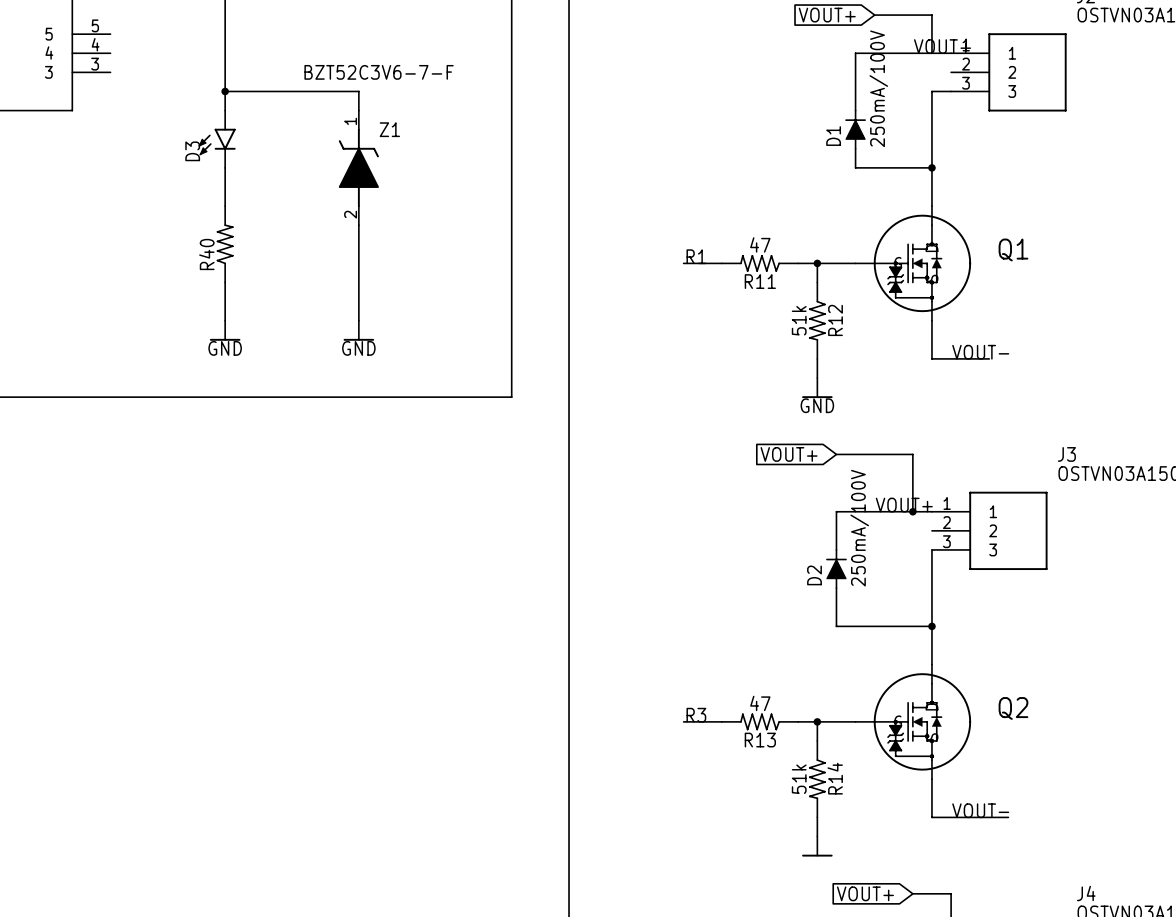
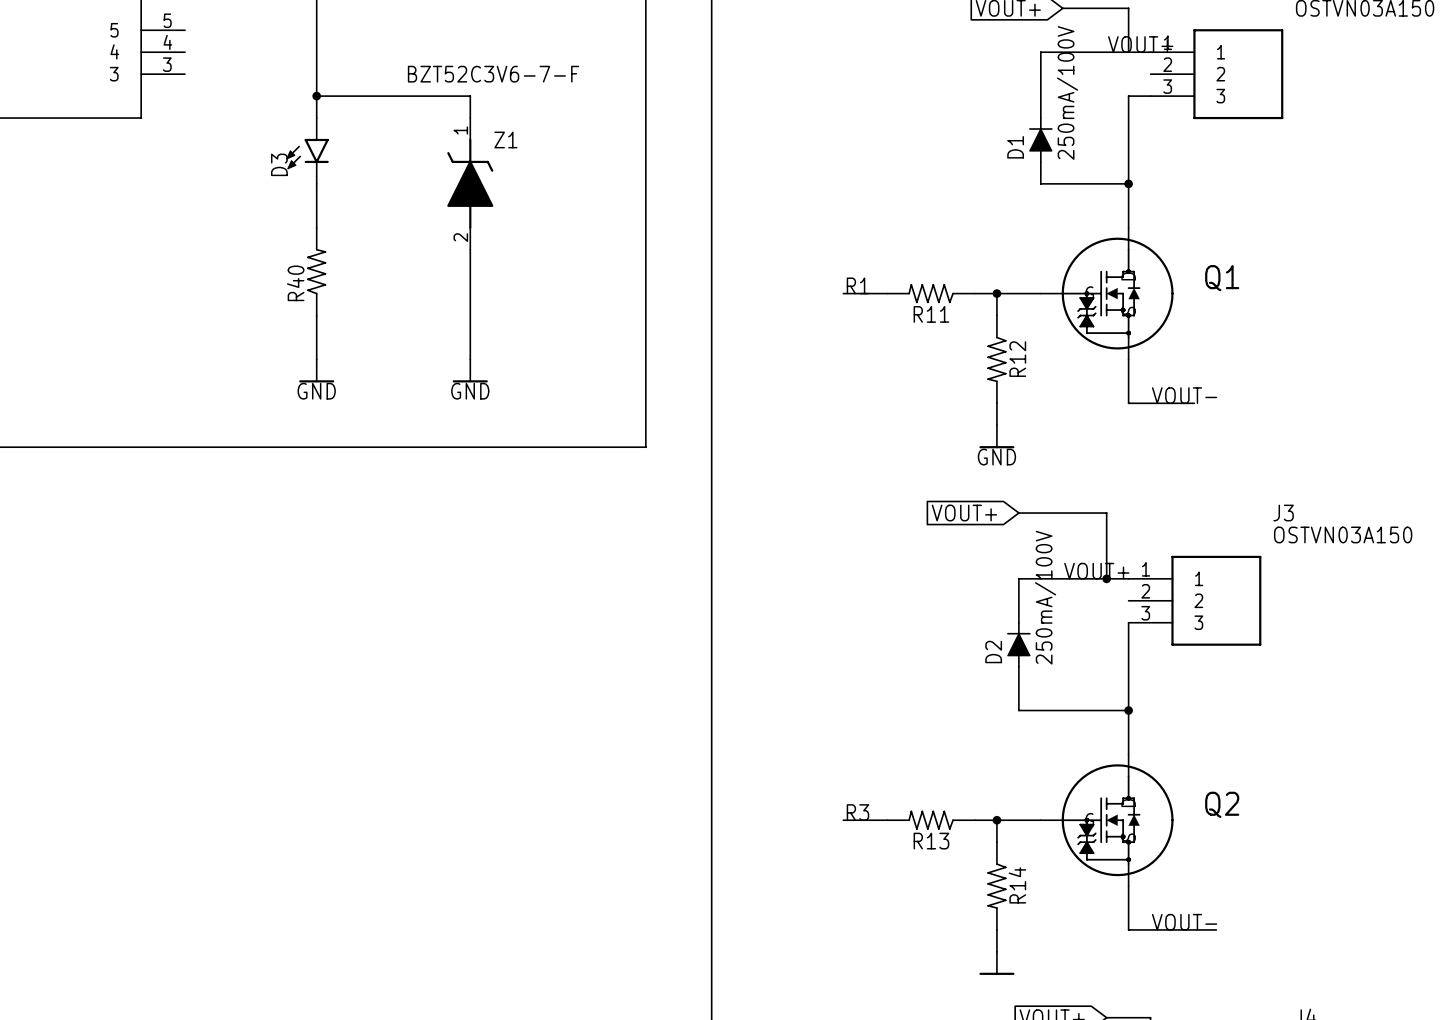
R11 value: 47 (760, 244) -> none
R12 value: 51k (799, 320) -> none
R13 value: 47 (760, 703) -> none
R14 value: 51k (799, 779) -> none

